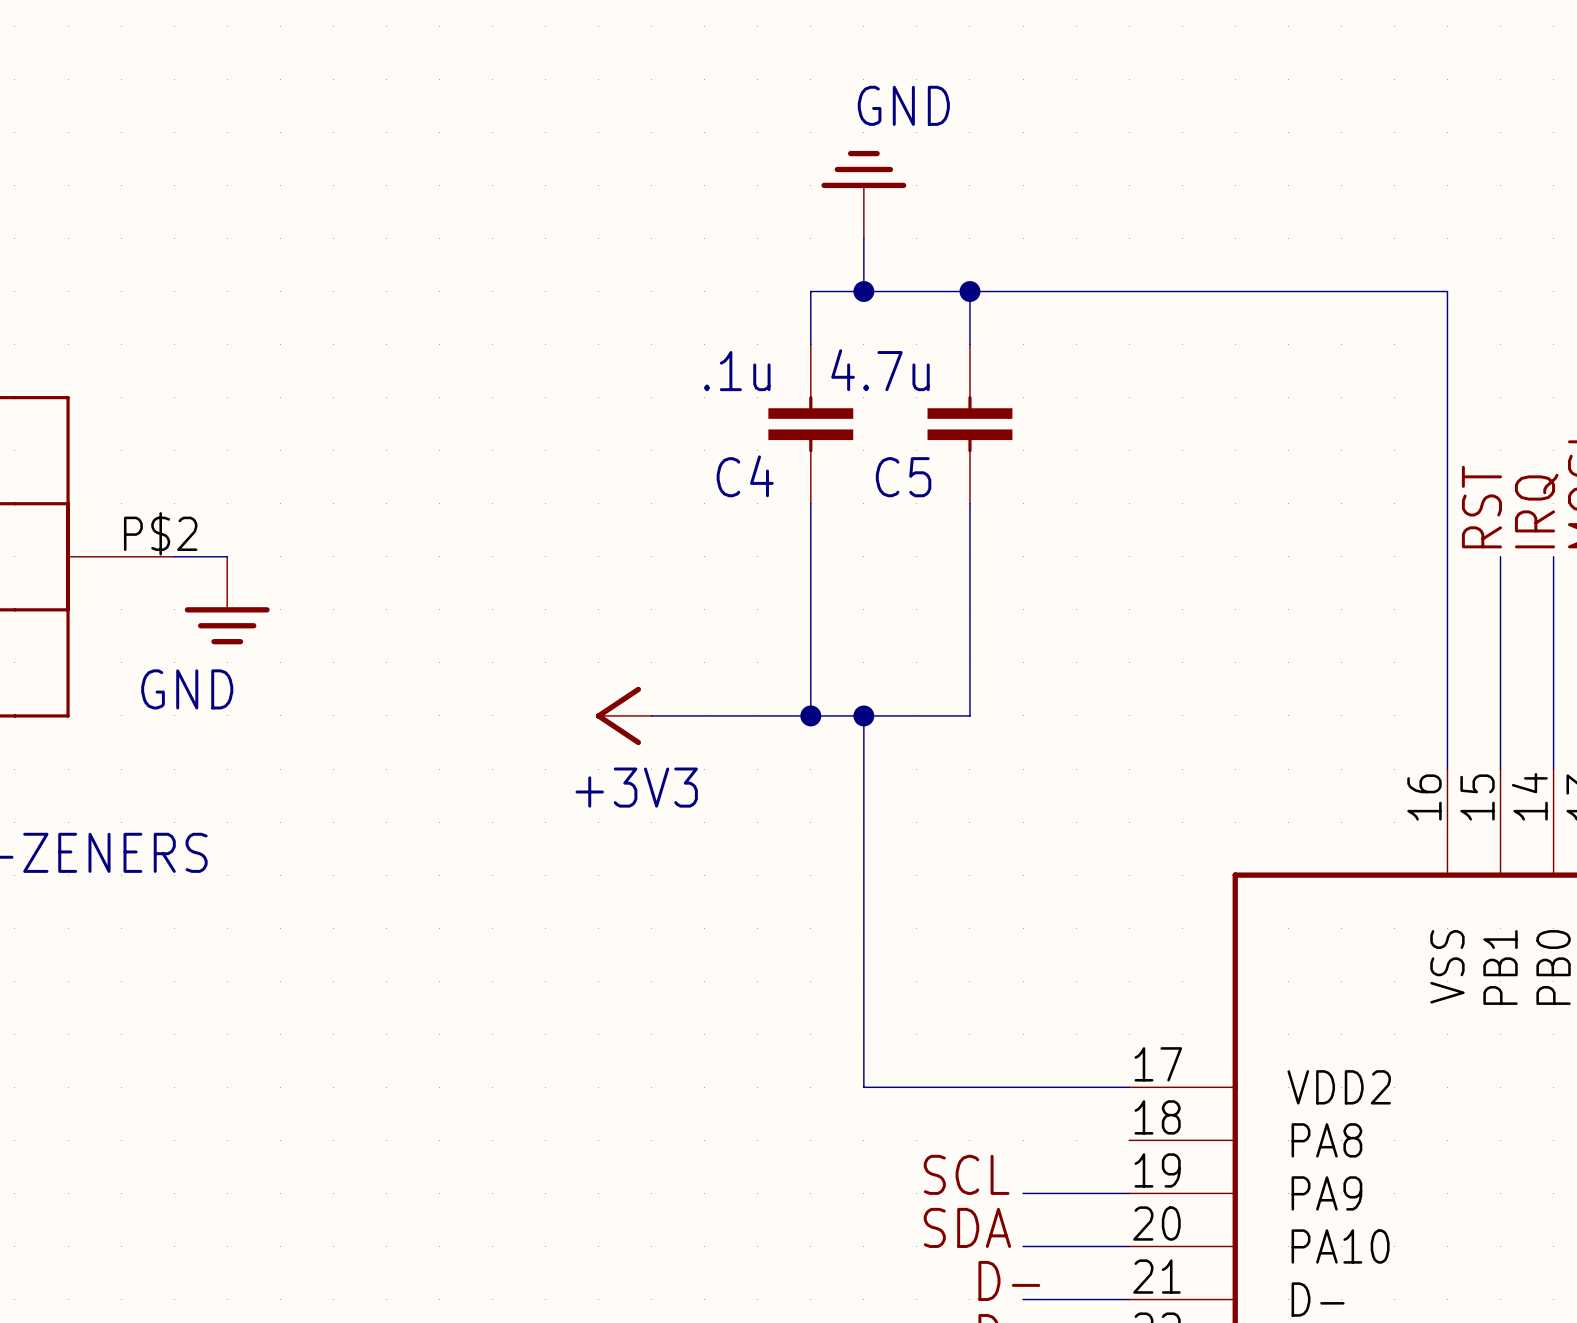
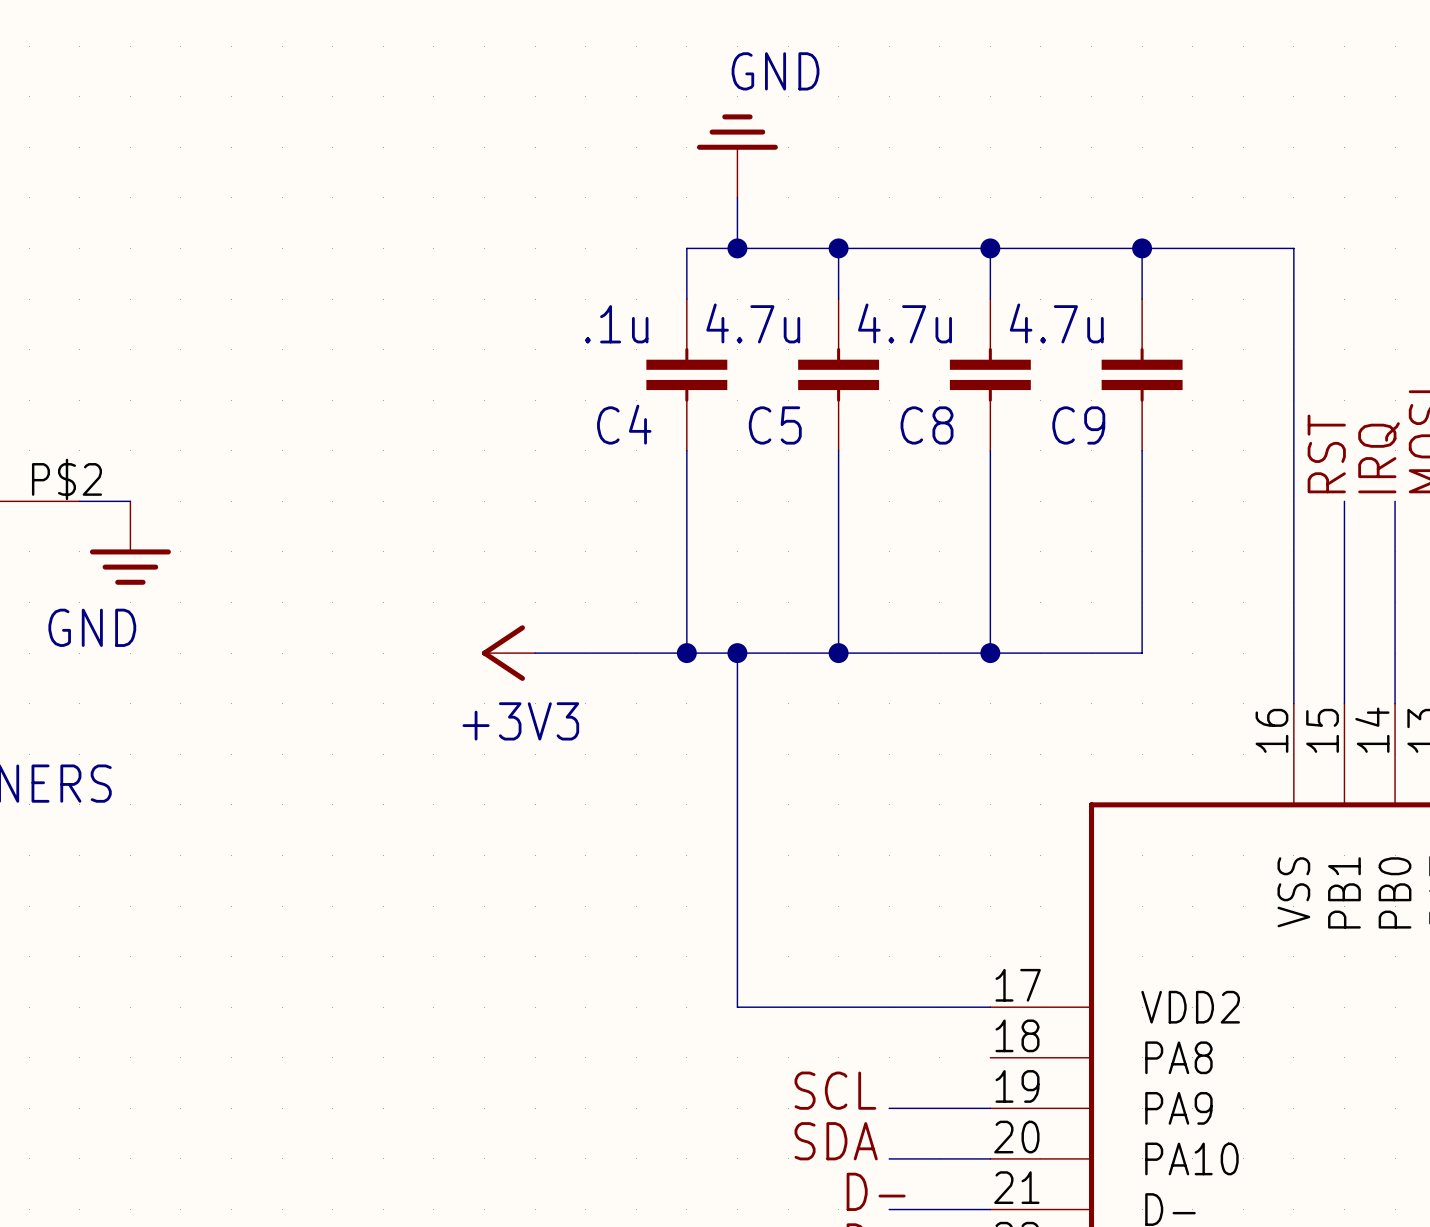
wire: none -> (990, 248) (990, 299)
junction: none -> (990, 248)
wire: none -> (1142, 248) (1142, 299)
junction: none -> (1142, 248)
C8: none -> 4.7u (990, 374)
C9: none -> 4.7u (1142, 374)
wire: none -> (990, 450) (990, 653)
wire: none -> (1142, 450) (1142, 653) (838, 653)
junction: none -> (838, 653)
junction: none -> (990, 653)

